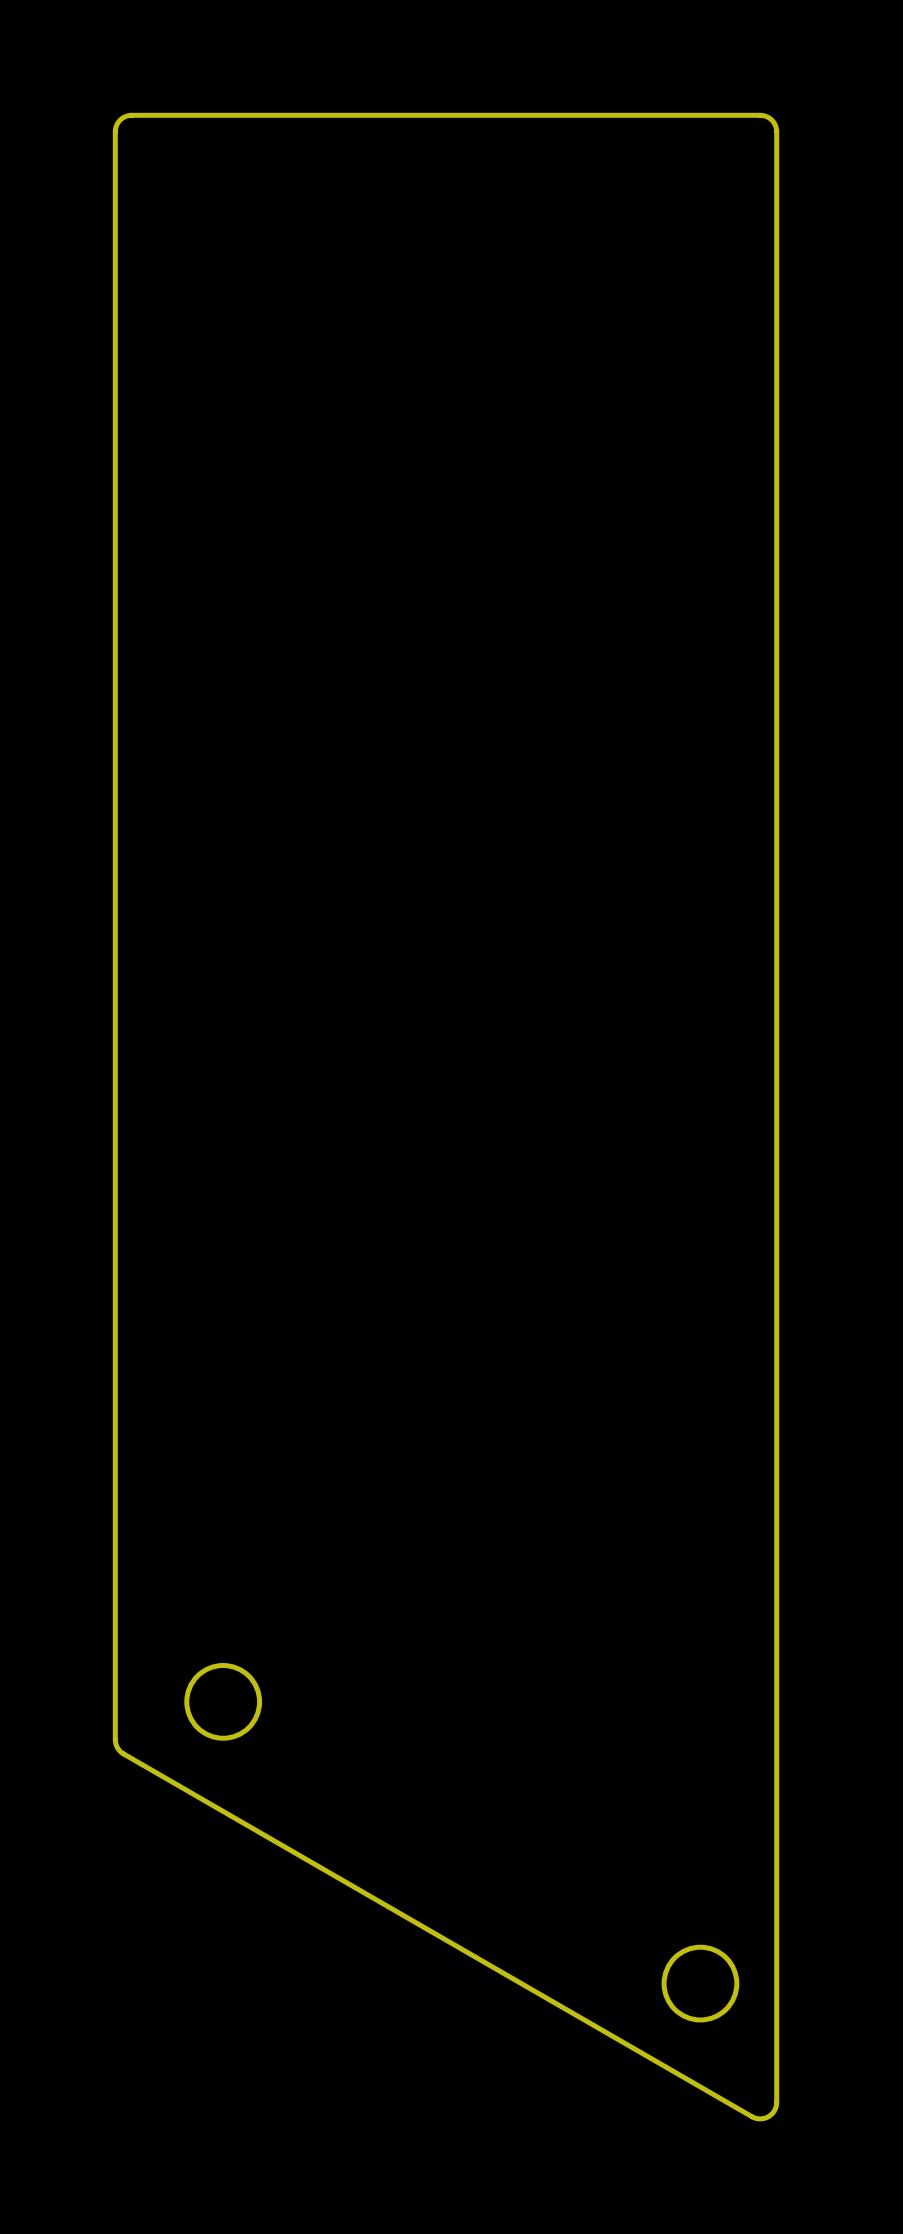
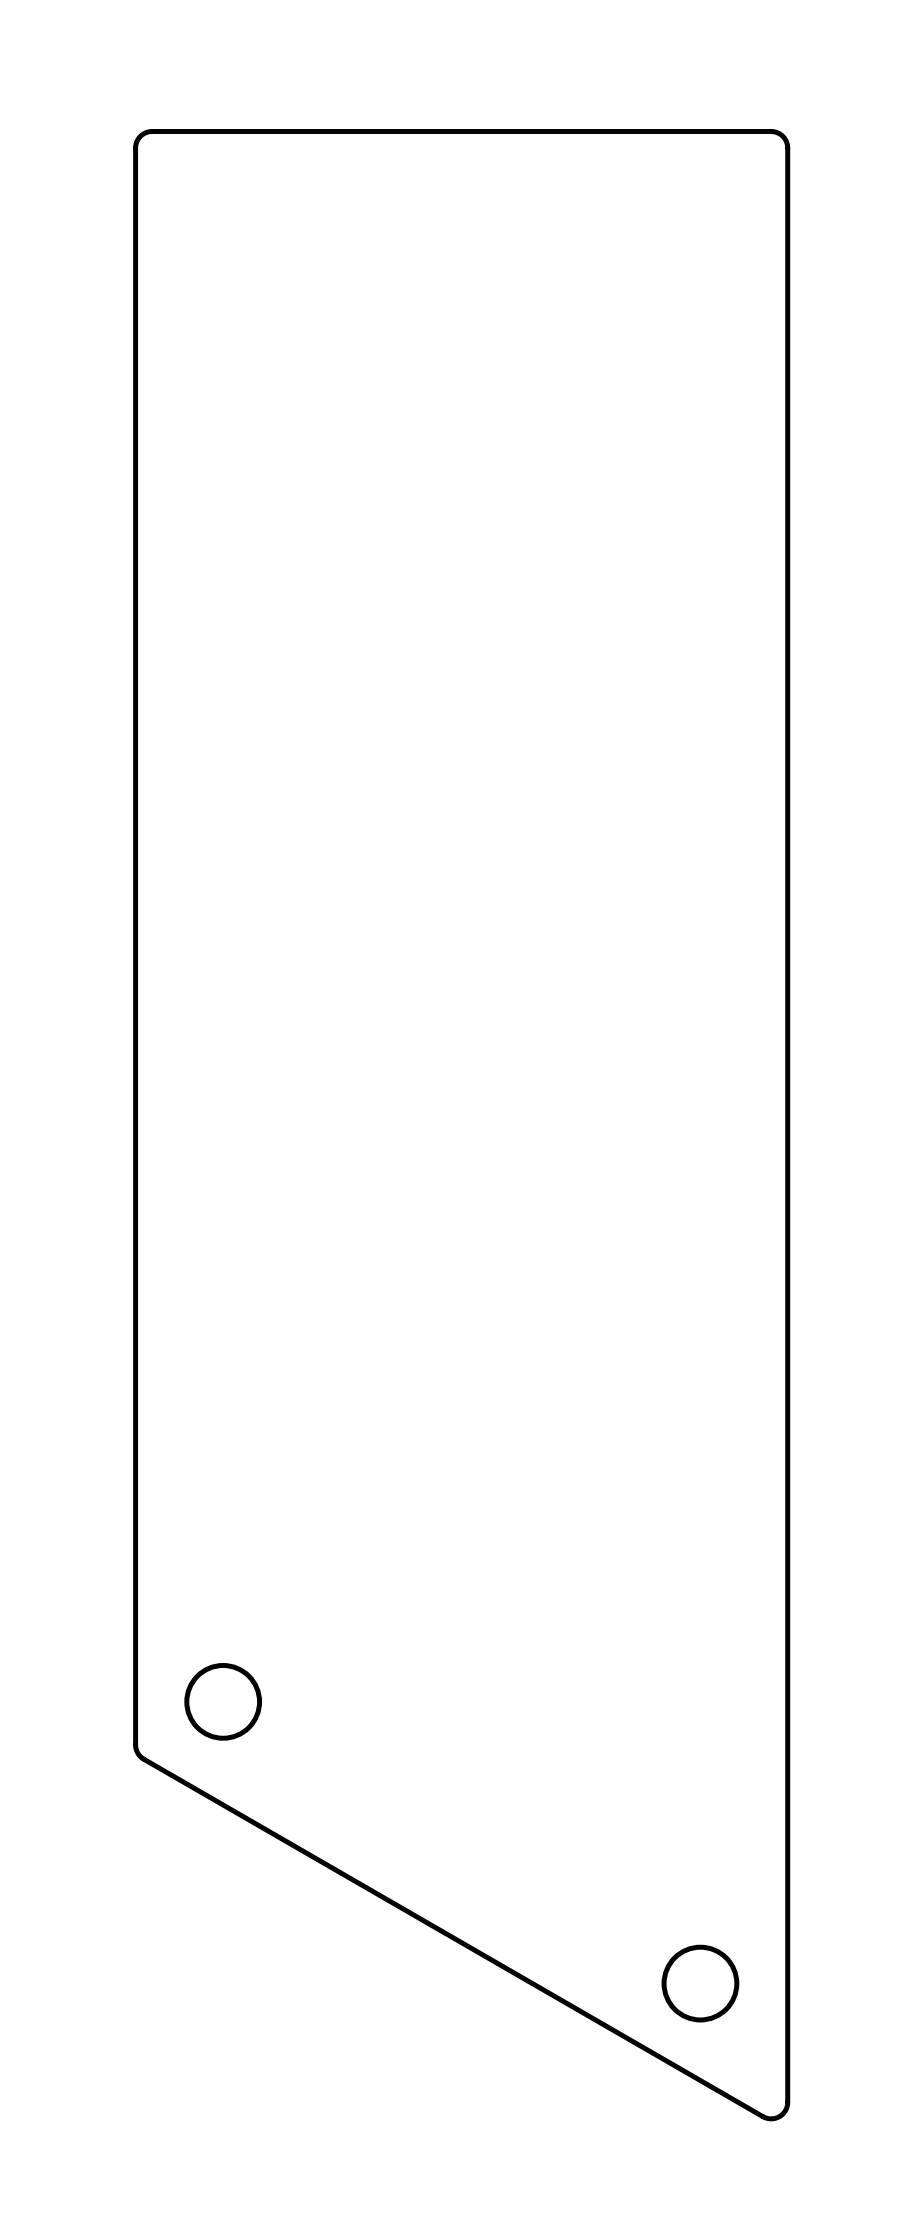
board edge: (131, 115) (760, 115) (770, 118) (776, 127) (776, 2102) (772, 2112) (764, 2118) (751, 2116) (123, 1753) (115, 1743) (115, 131) (120, 120) (131, 115) -> (152, 131) (140, 136) (135, 148) (136, 1749) (143, 1759) (762, 2116) (775, 2118) (783, 2112) (787, 2102) (787, 143) (781, 134) (771, 131) (152, 131)

